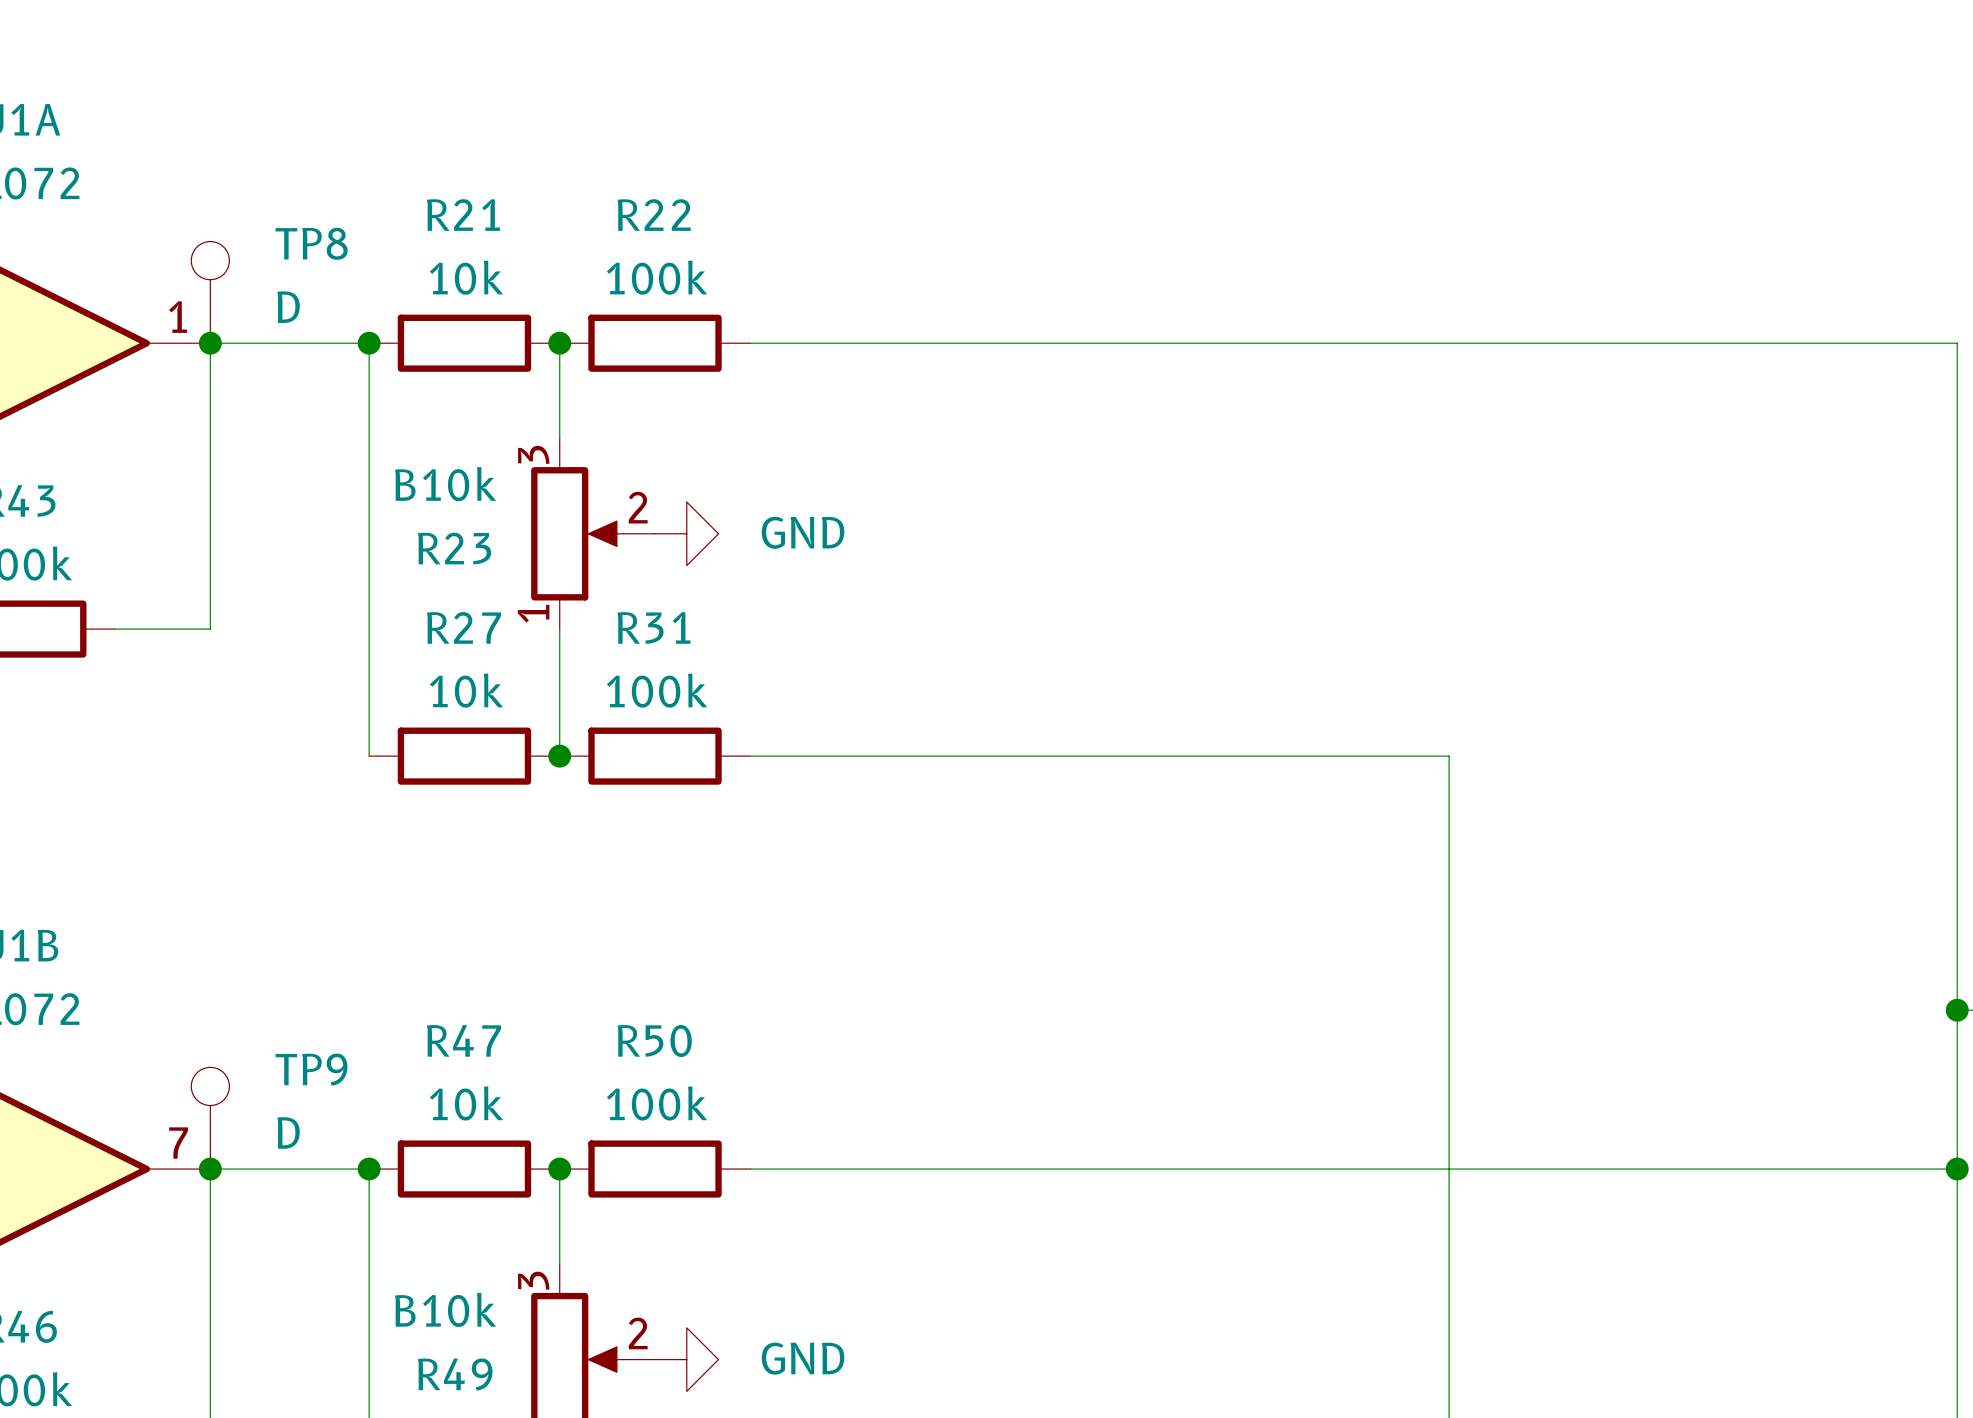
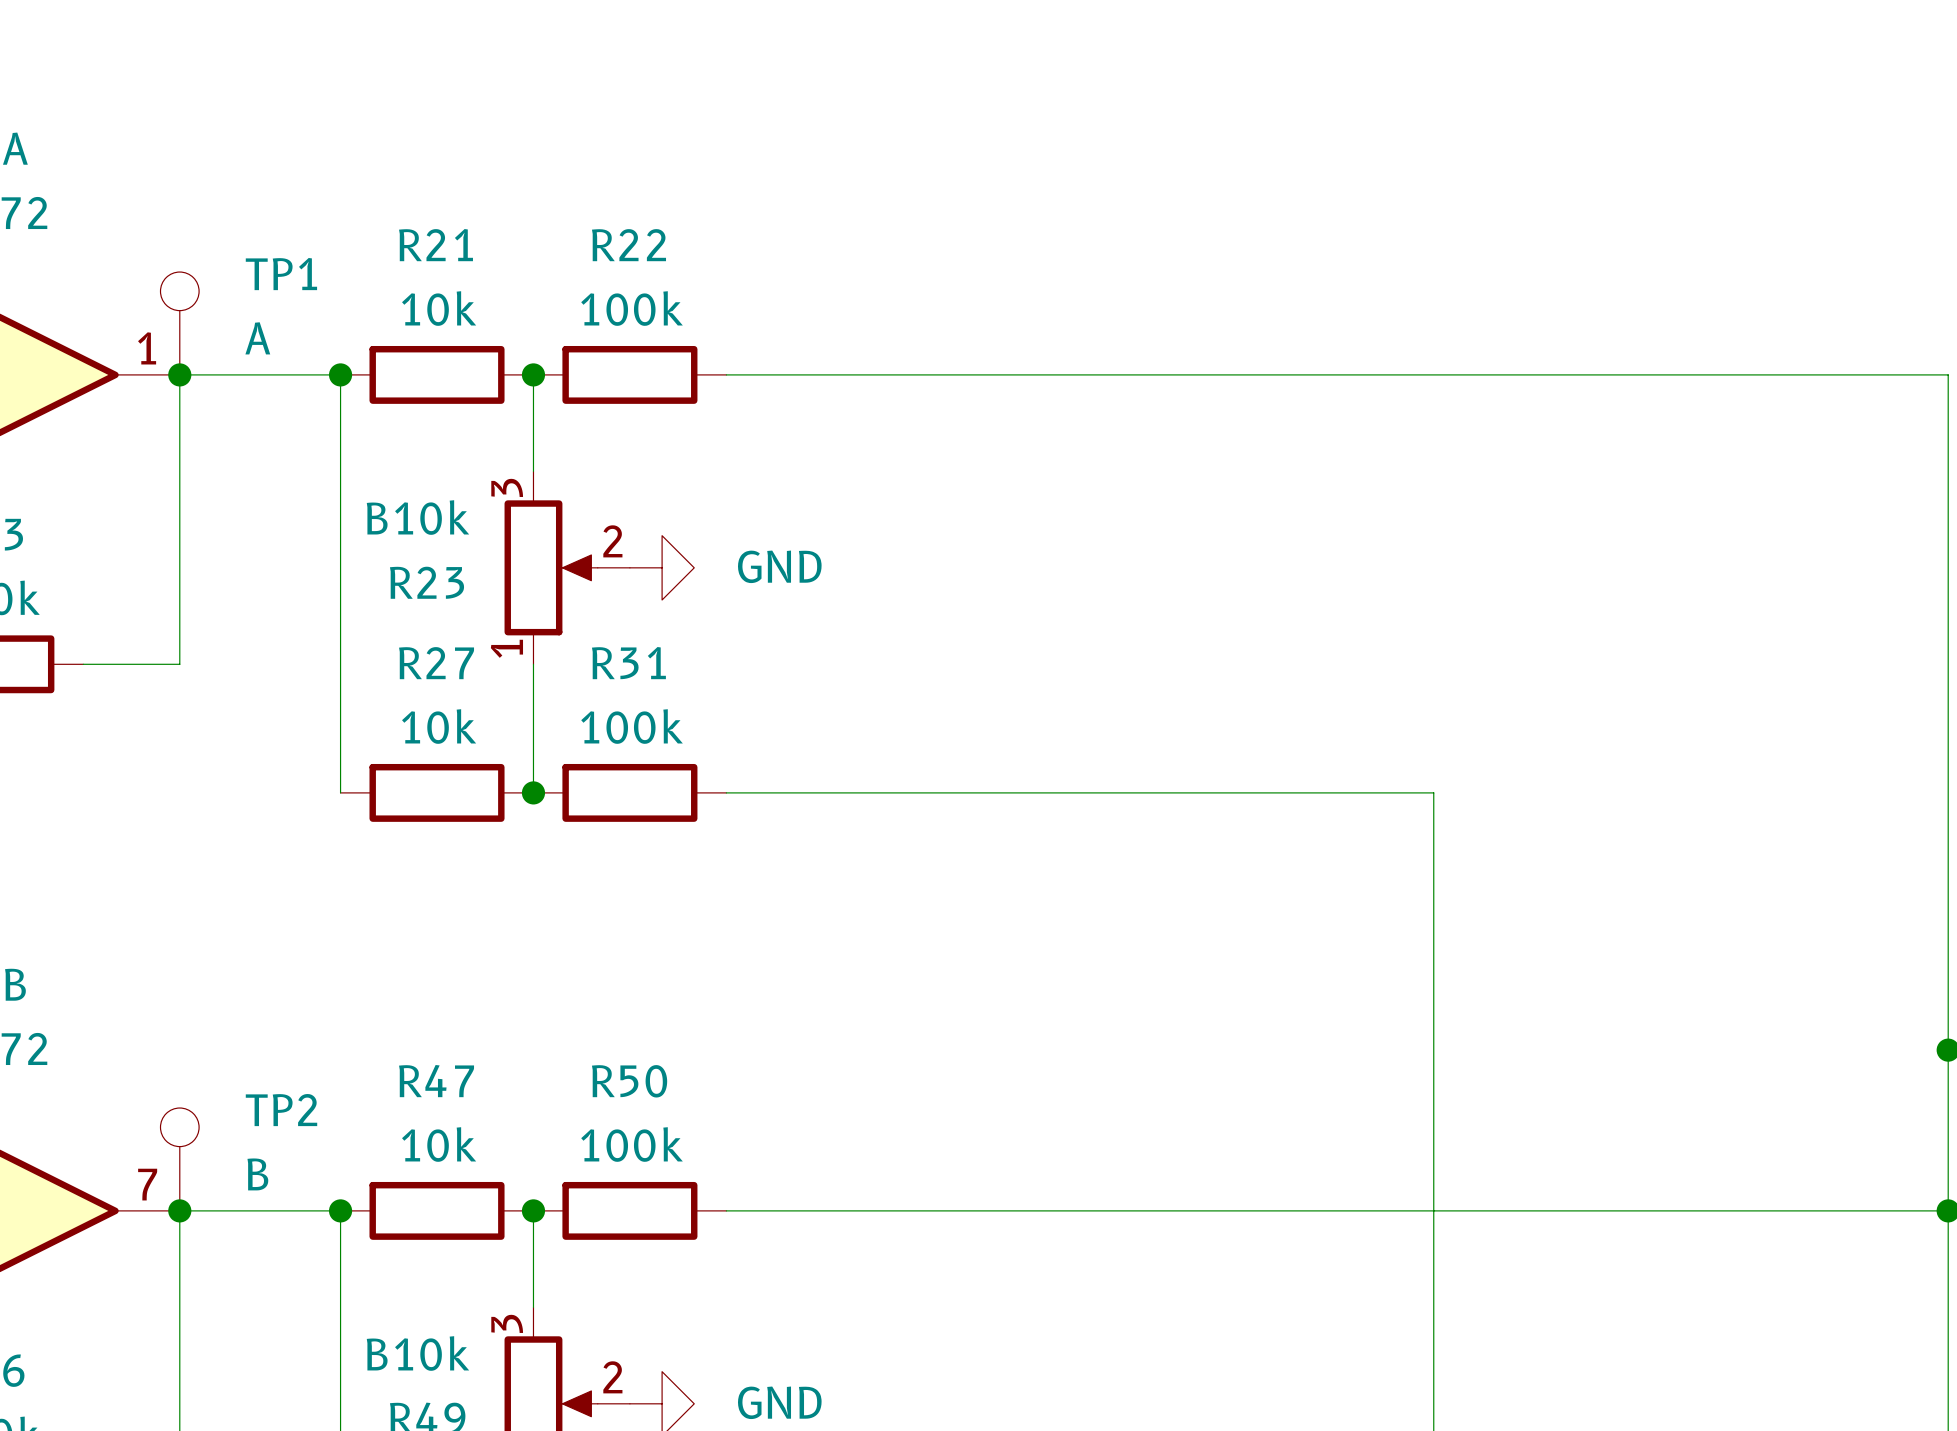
TP8 name: TP8 (311, 243) -> TP1 (281, 274)
TP8 value: D (288, 307) -> A (257, 338)
TP9 name: TP9 (311, 1069) -> TP2 (281, 1110)
TP9 value: D (288, 1133) -> B (257, 1174)

